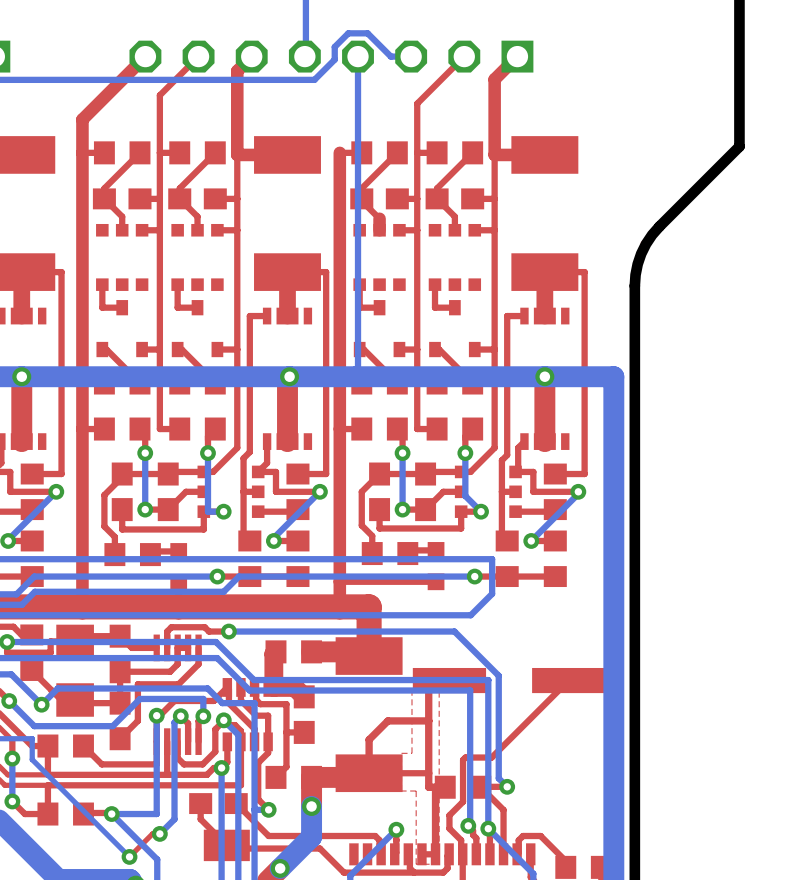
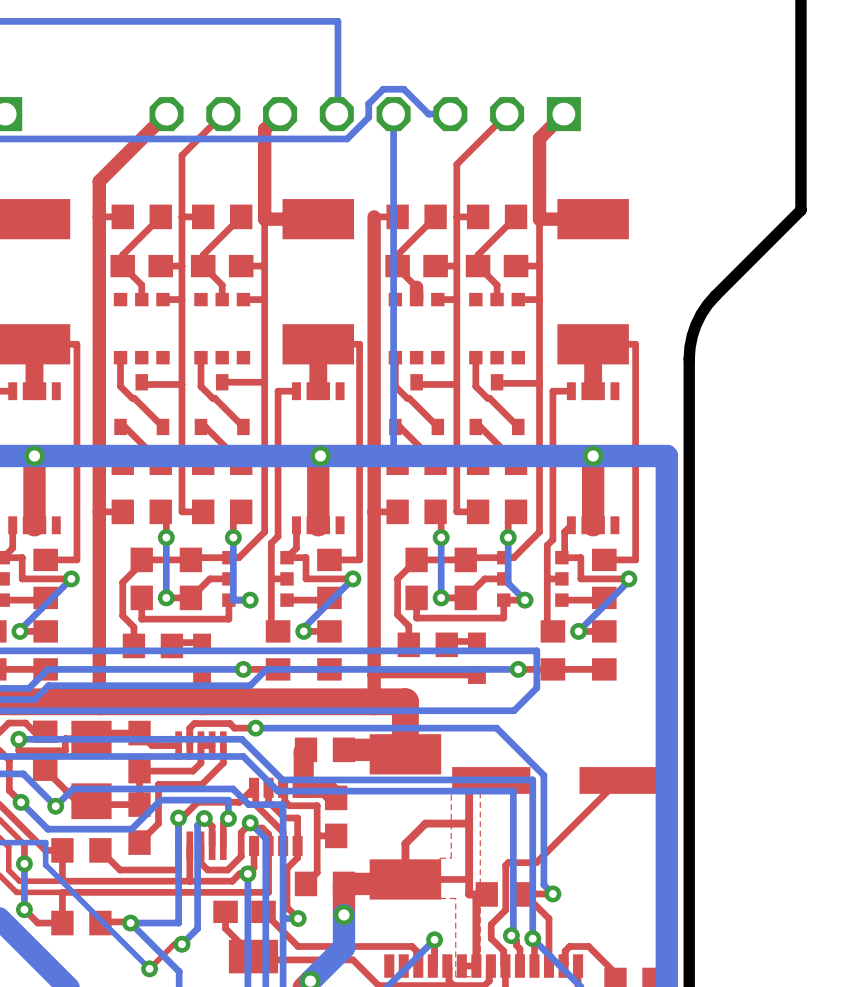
top track: (122, 307) (102, 307) -> (162, 426) (120, 386) (120, 382)
top track: none -> (141, 382) (143, 384) (181, 384)
top track: (197, 307) (177, 307) -> (243, 426) (200, 386) (200, 382)
top track: none -> (264, 382) (222, 382)
top track: (379, 307) (359, 307) -> (437, 426) (395, 386) (395, 382)
top track: none -> (416, 382) (418, 384) (456, 384)
top track: (454, 307) (435, 307) -> (518, 426) (475, 386) (475, 382)
top track: none -> (497, 382) (539, 383)
top track: (159, 349) (142, 349) -> none
top track: (237, 349) (217, 349) -> none
top track: (417, 349) (399, 349) -> none
top track: (494, 349) (474, 349) -> none

